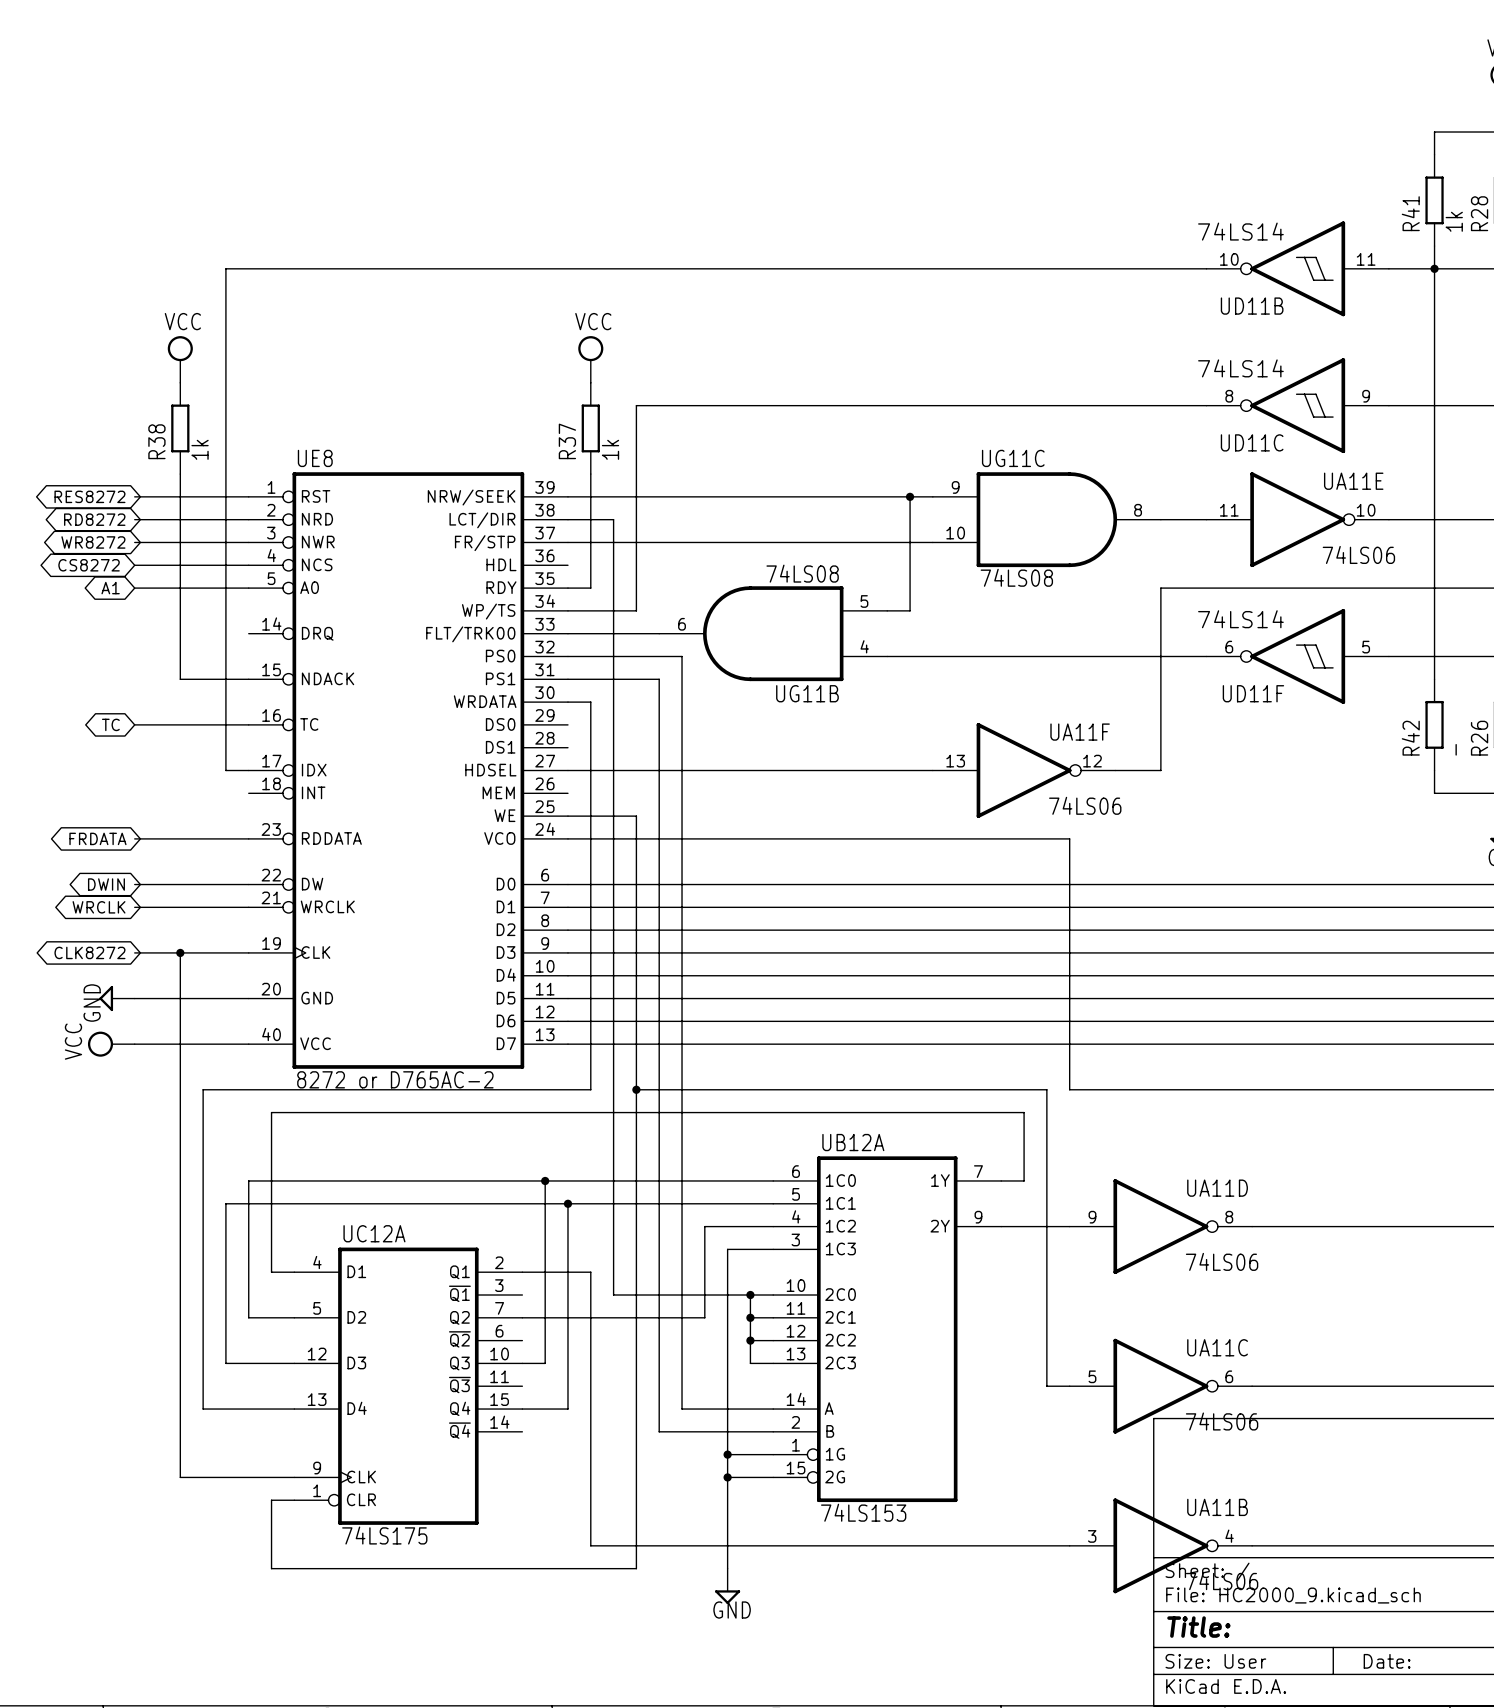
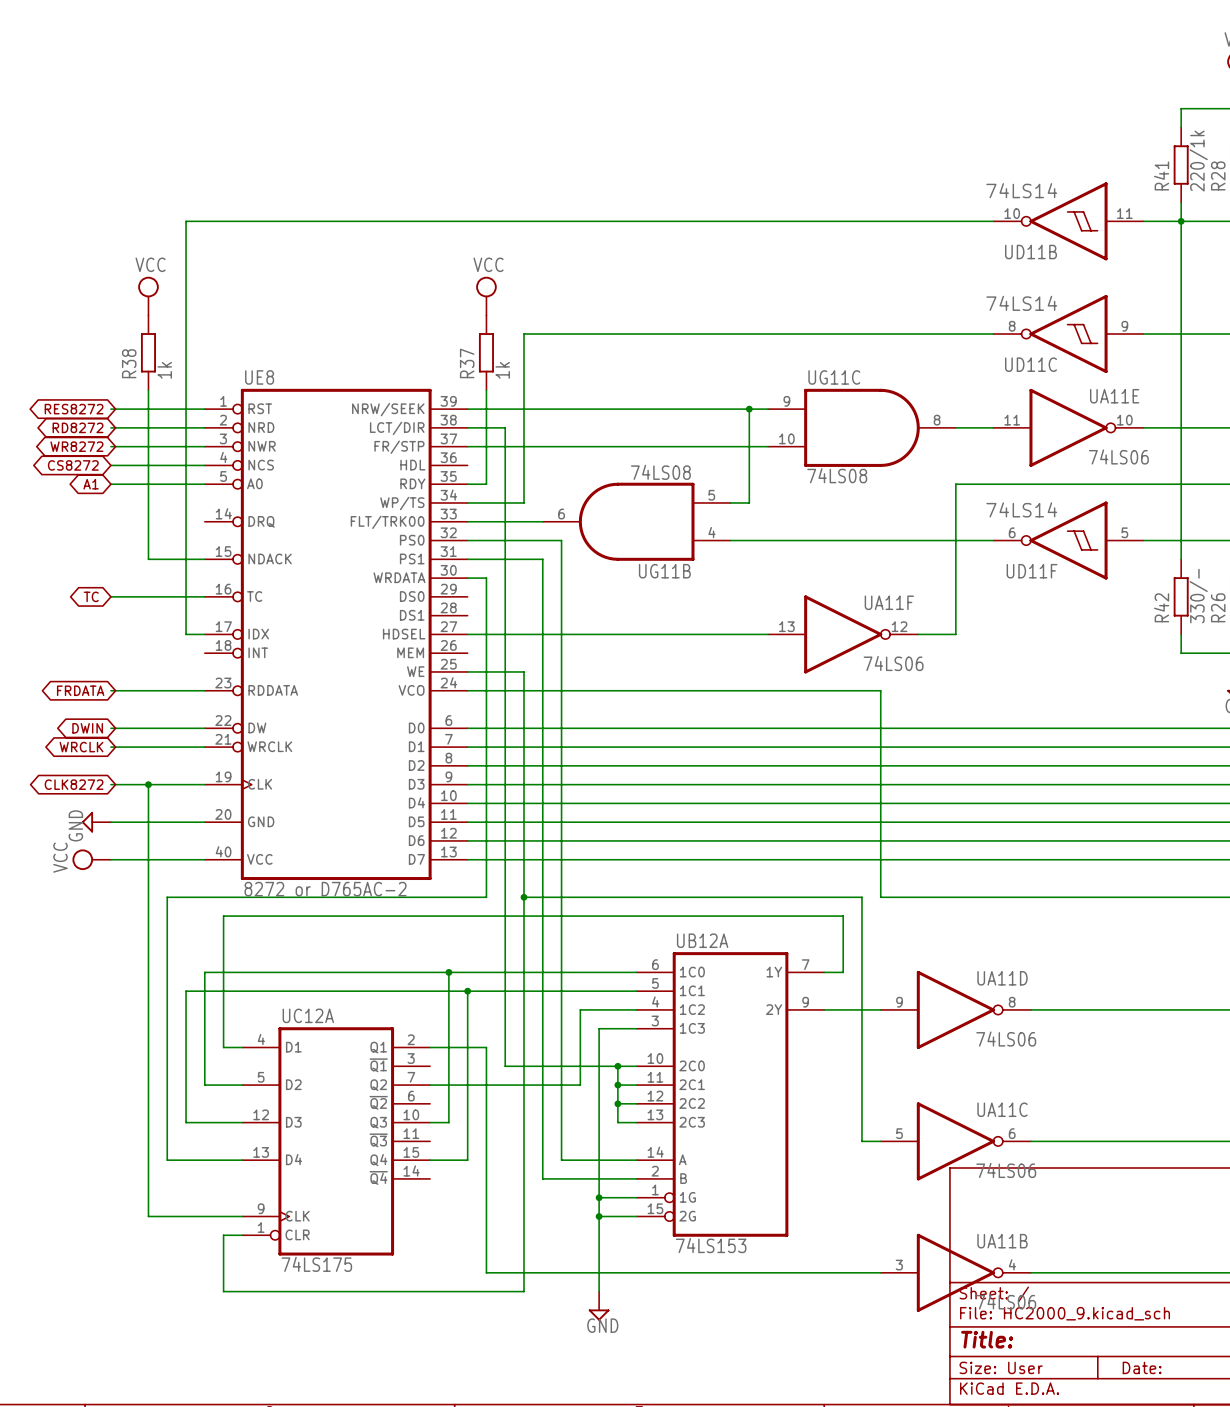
R41 value: 1k (1454, 221) -> 220/1k (1198, 161)
R42 value: - (1456, 749) -> 330/- (1198, 596)

